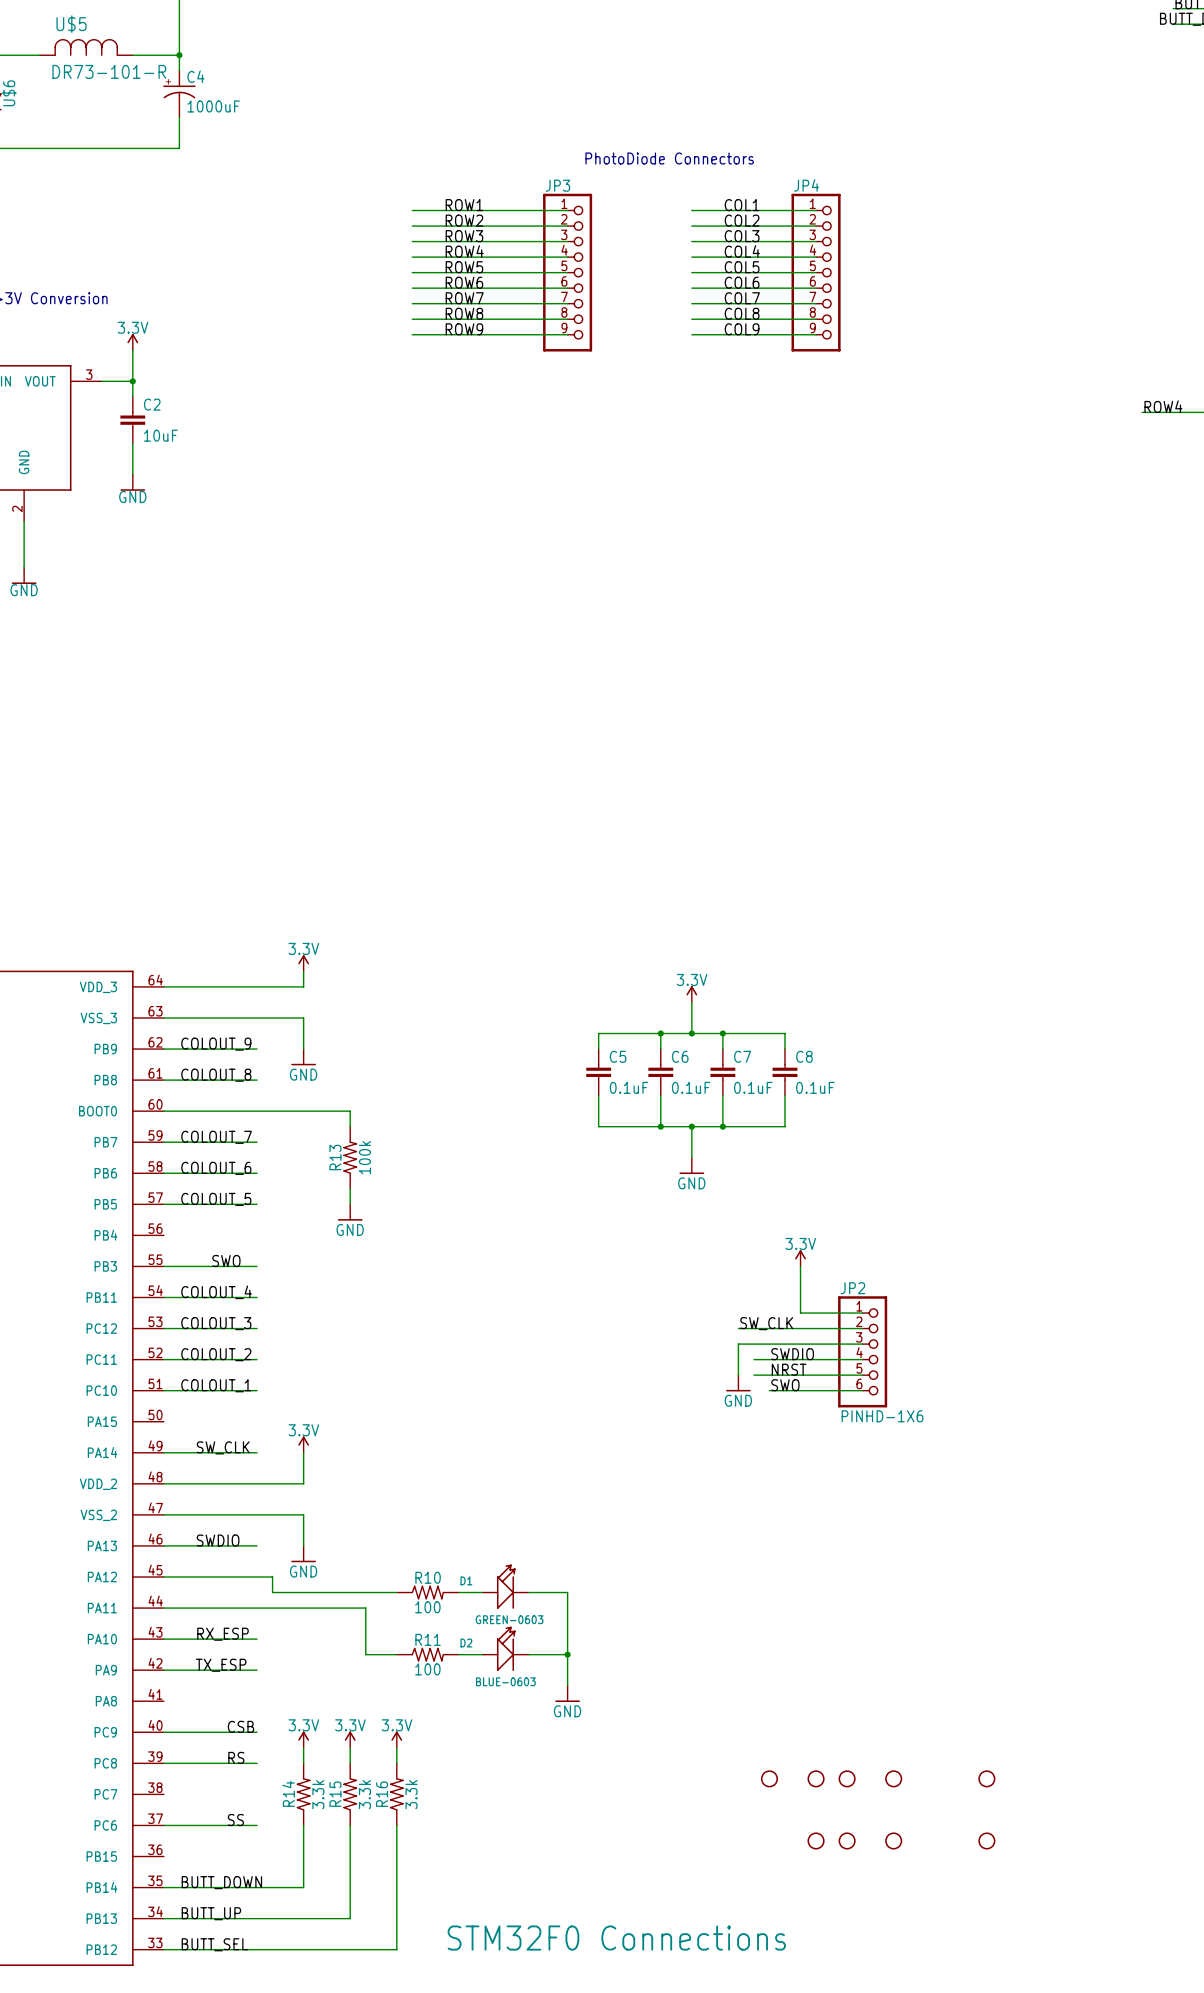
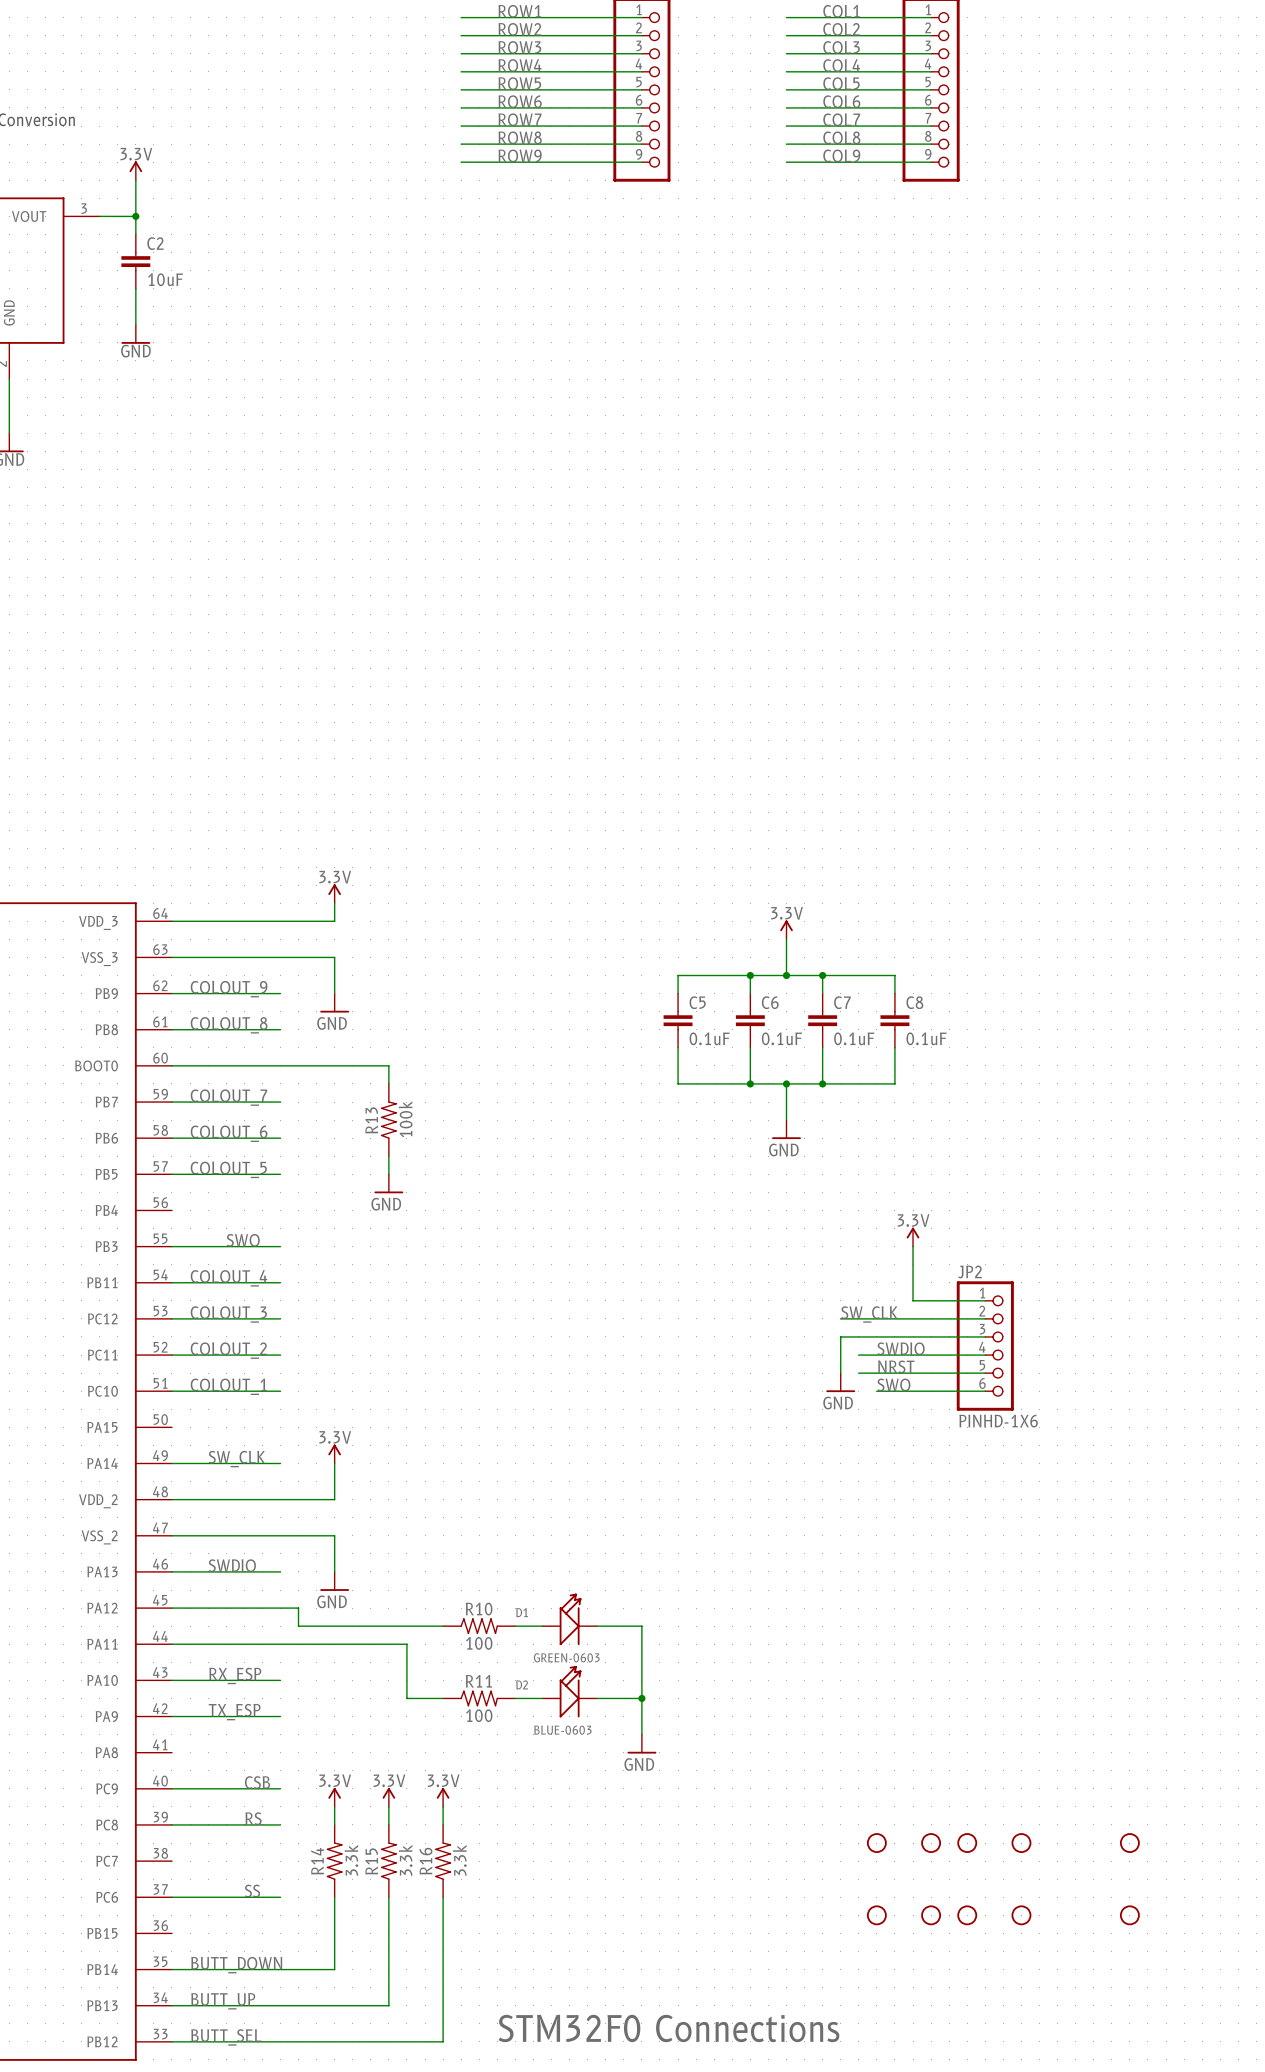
part: none -> (876, 1915)

